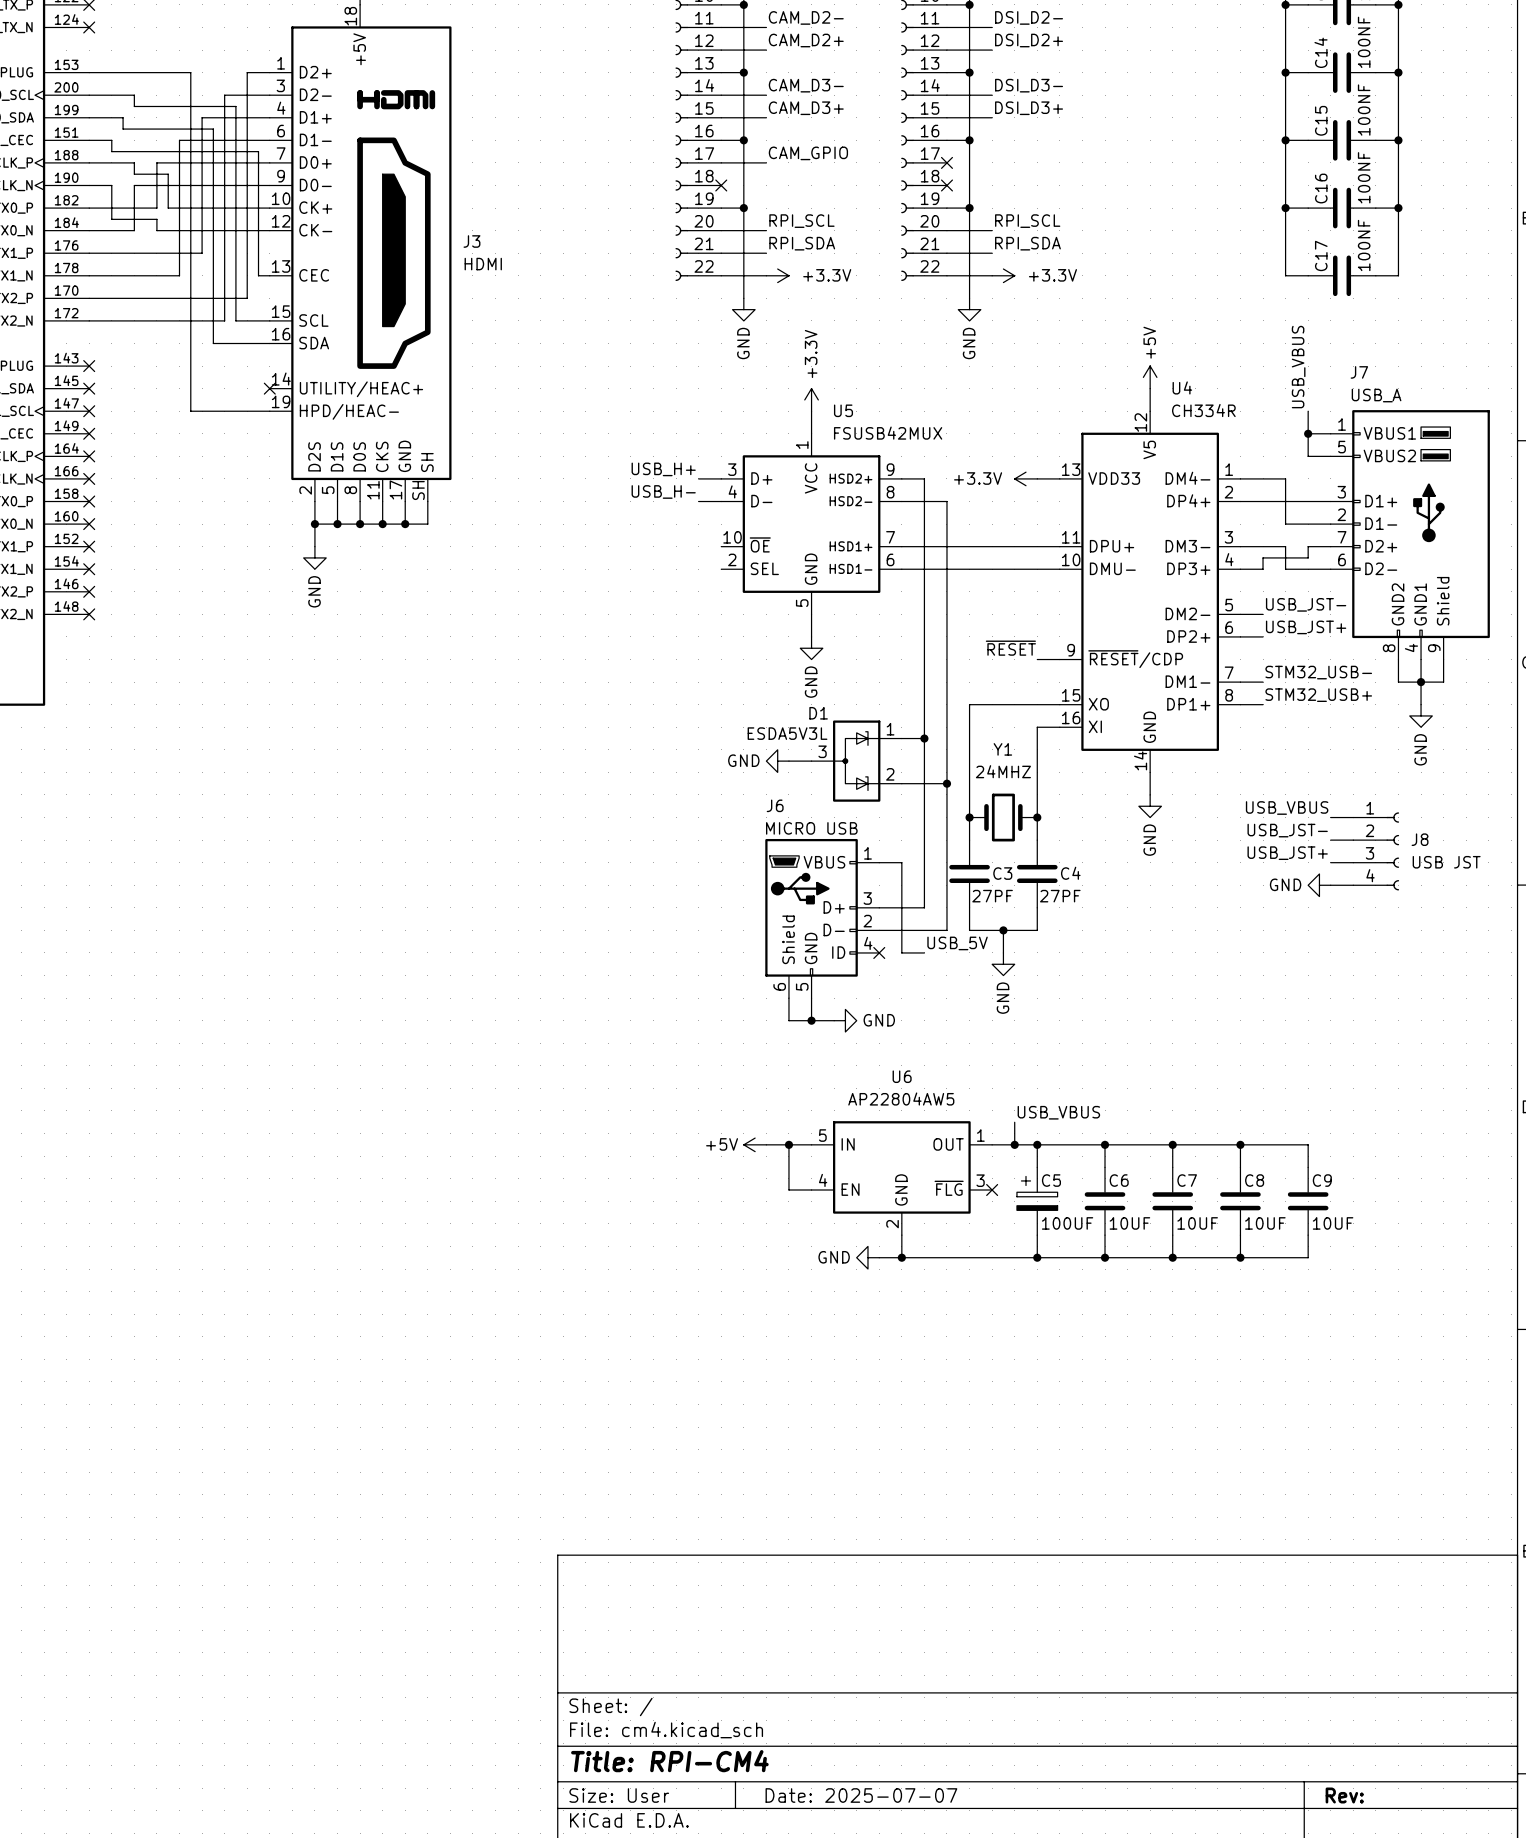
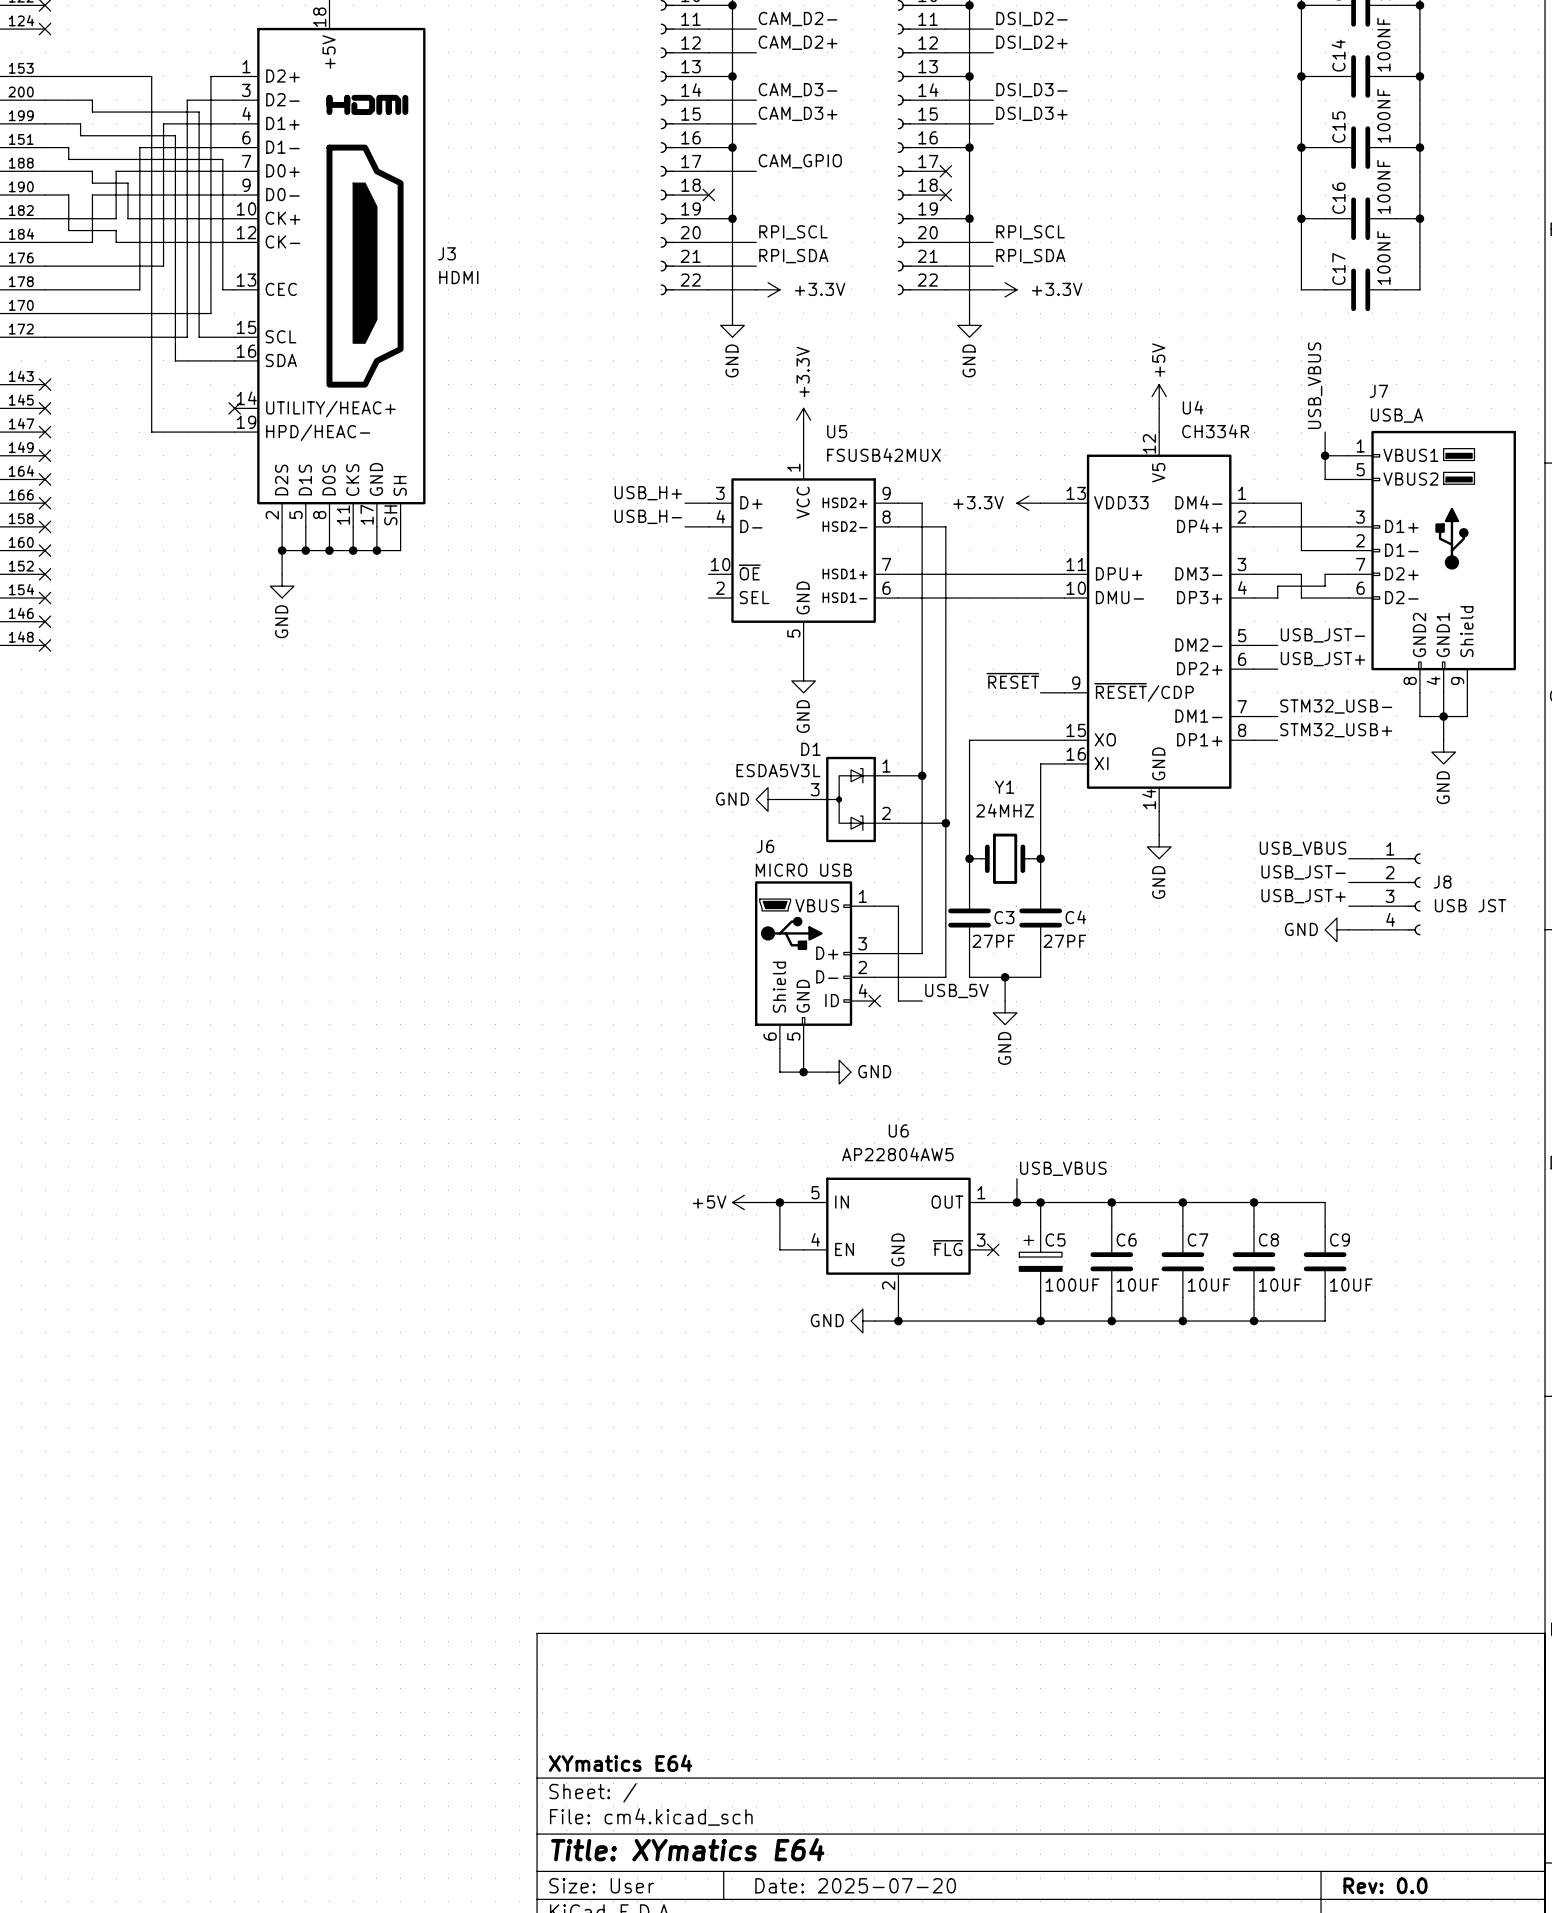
title block: none -> XYmatics E64 (620, 1763)
title block: Title: RPI-CM4 (669, 1761) -> Title: XYmatics E64 (687, 1849)
title block: Date: 2025-07-07 (861, 1795) -> Date: 2025-07-20 (855, 1885)
title block: Rev: (1344, 1795) -> Rev: 0.0 (1385, 1885)

